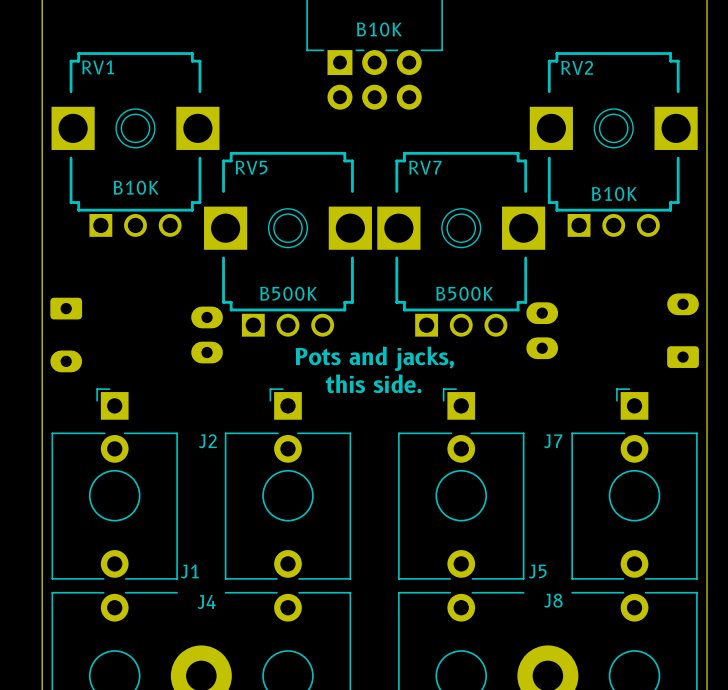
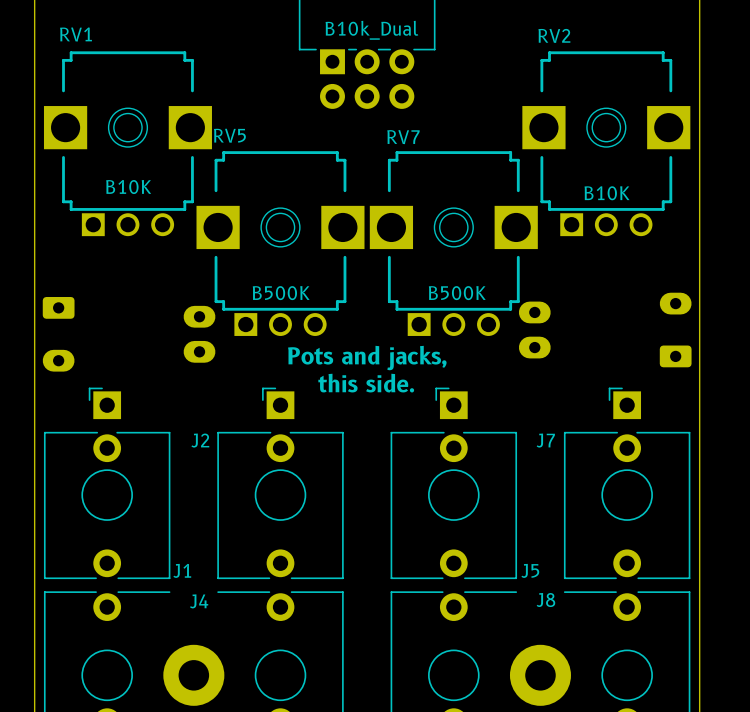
part value: B10K (379, 29) -> B10k_Dual (371, 30)
RV1 name position: RV1 (98, 67) -> RV1 (76, 34)
RV2 name position: RV2 (577, 67) -> RV2 (554, 35)
RV5 name position: RV5 (251, 167) -> RV5 (229, 135)
RV7 name position: RV7 (425, 167) -> RV7 (403, 137)

